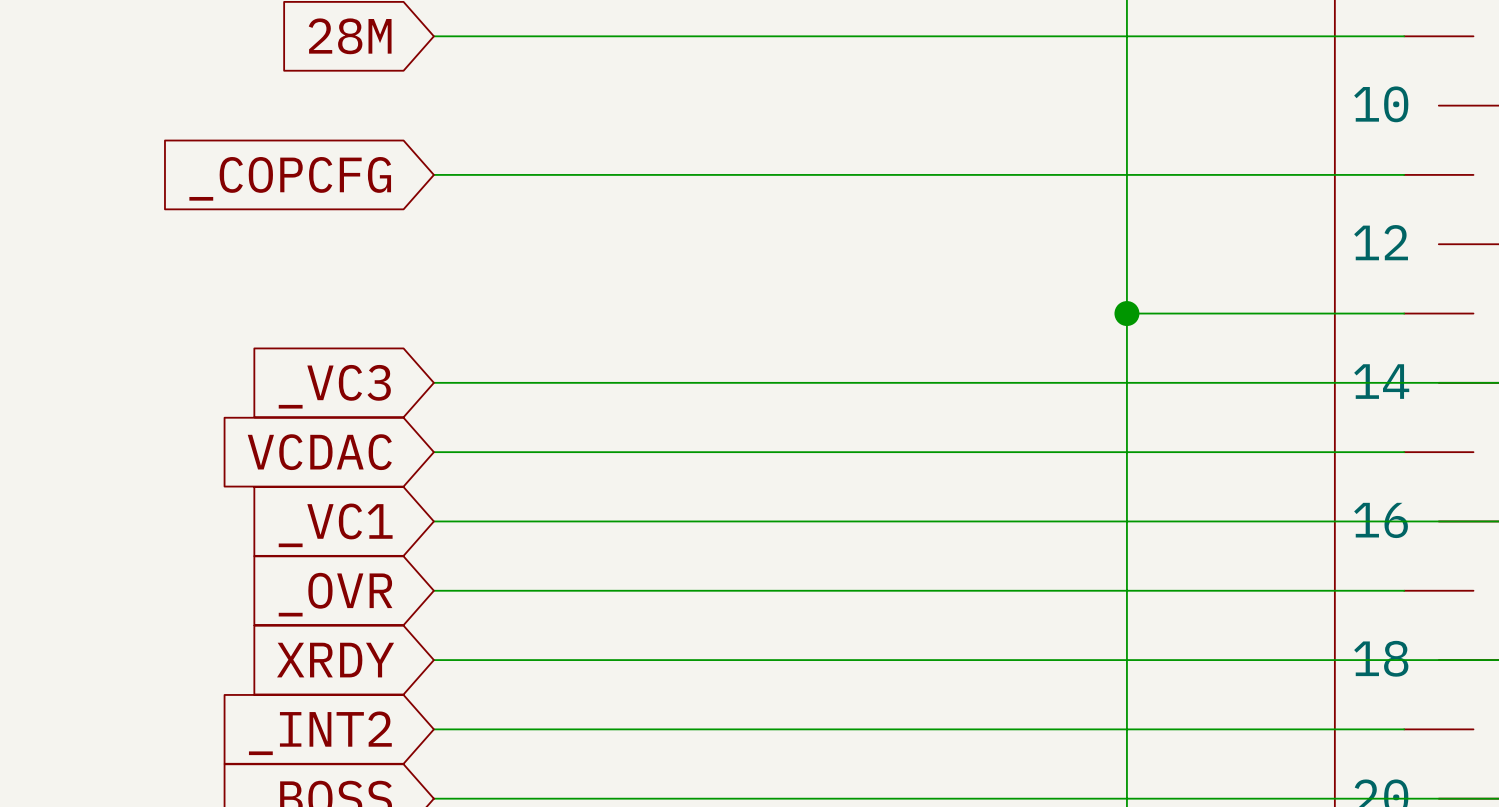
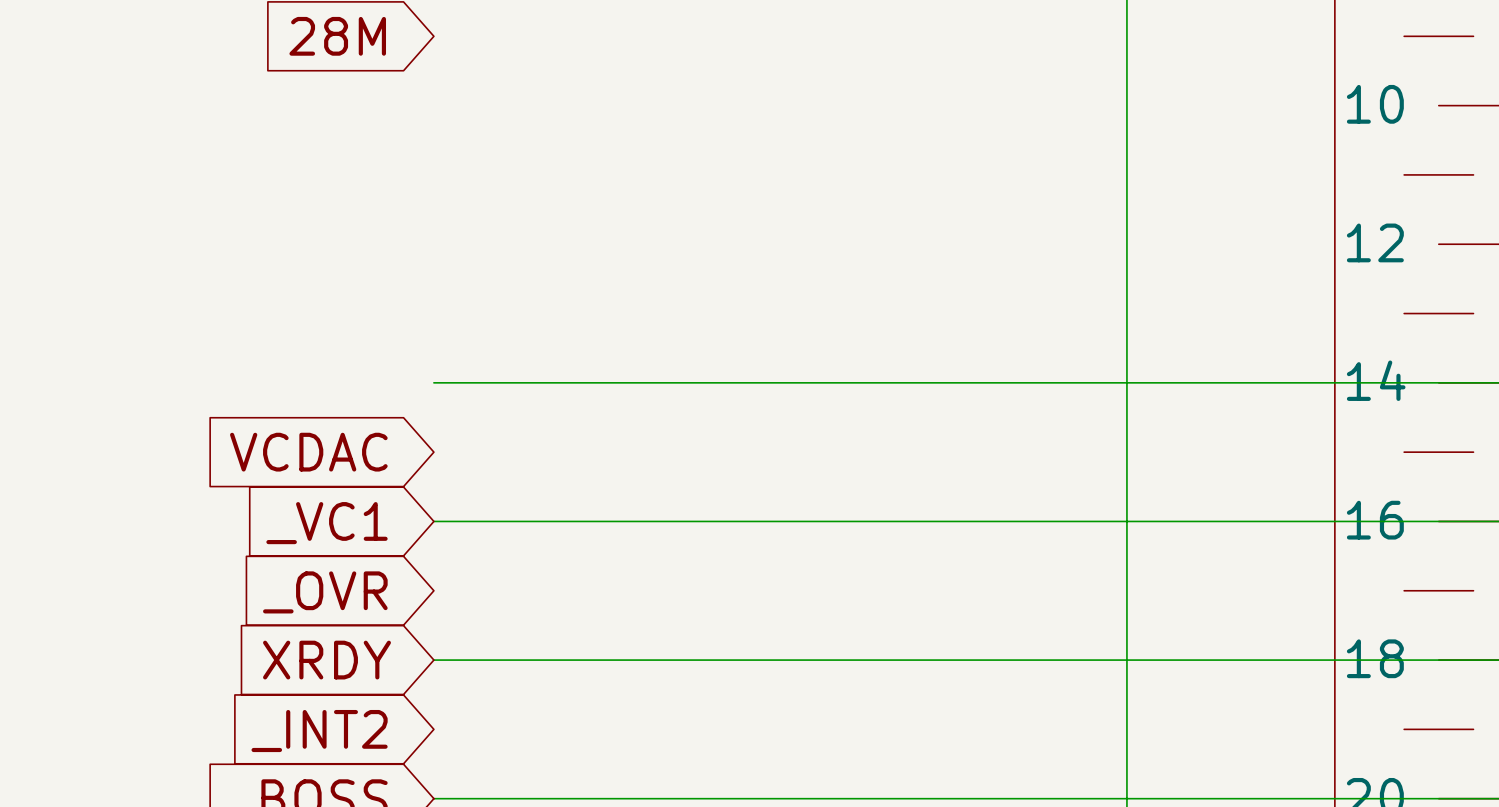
wire: (433, 36) (1404, 36) -> none
wire: (433, 174) (1404, 174) -> none
global label: _COPCFG (290, 178) -> none
wire: (1126, 313) (1404, 313) -> none
junction: (1126, 313) -> none
global label: _VC3 (334, 386) -> none
wire: (433, 452) (1404, 452) -> none
wire: (433, 590) (1404, 590) -> none
wire: (433, 729) (1404, 729) -> none

